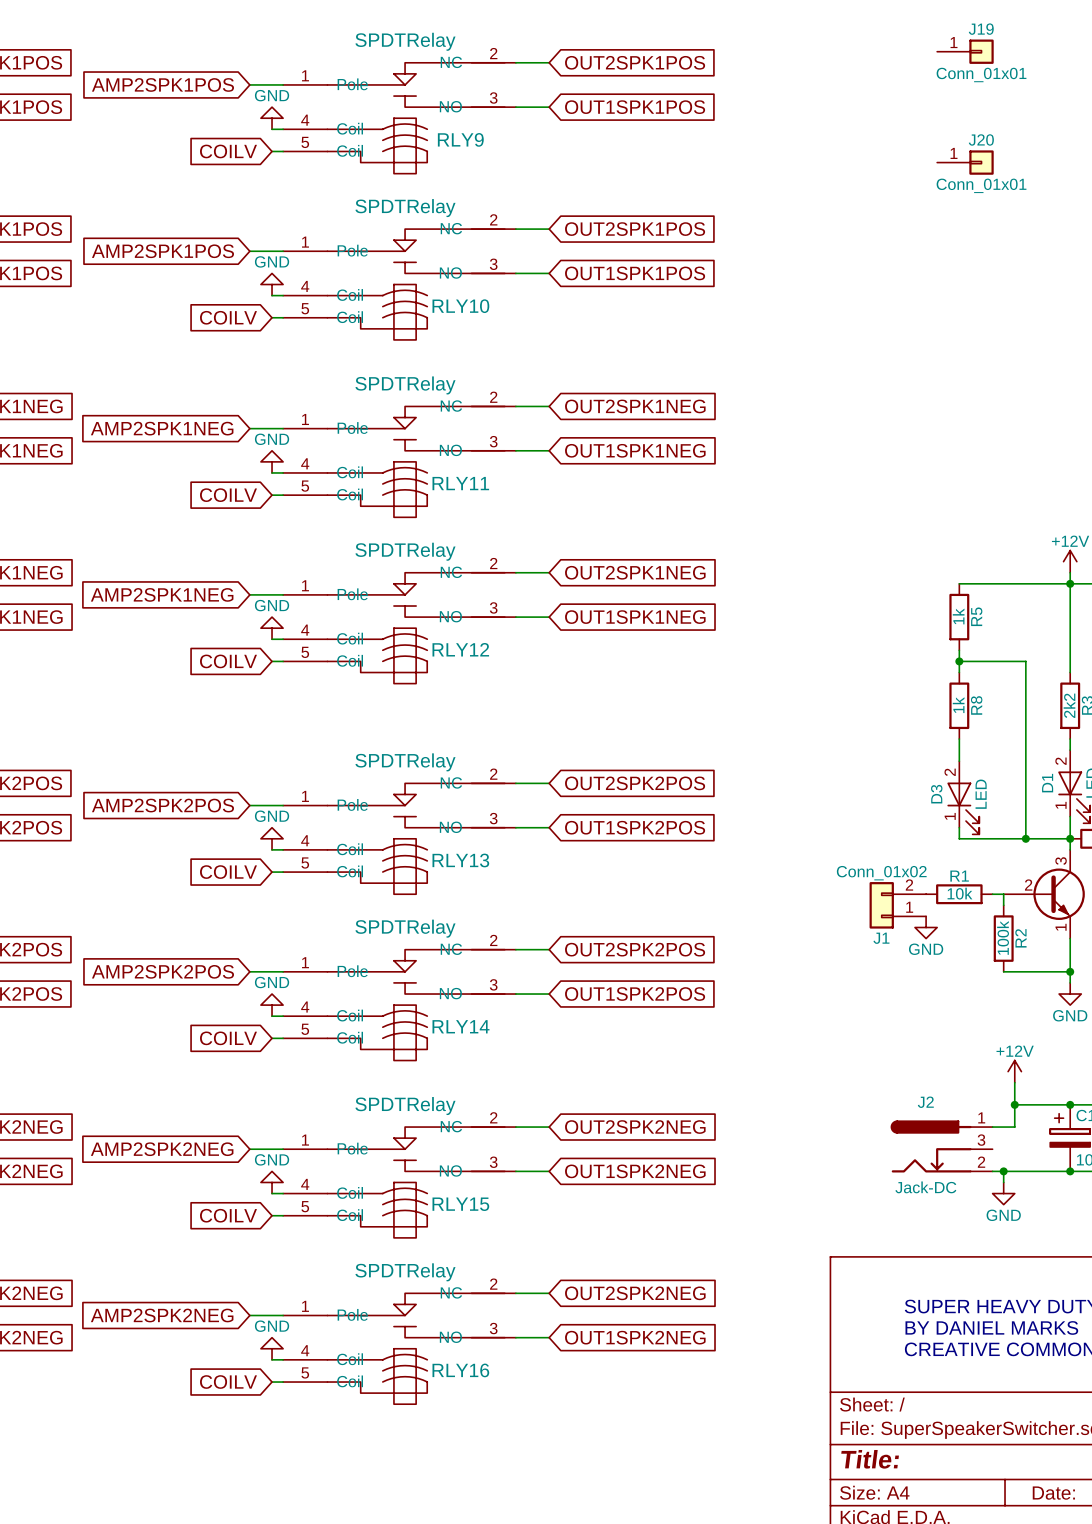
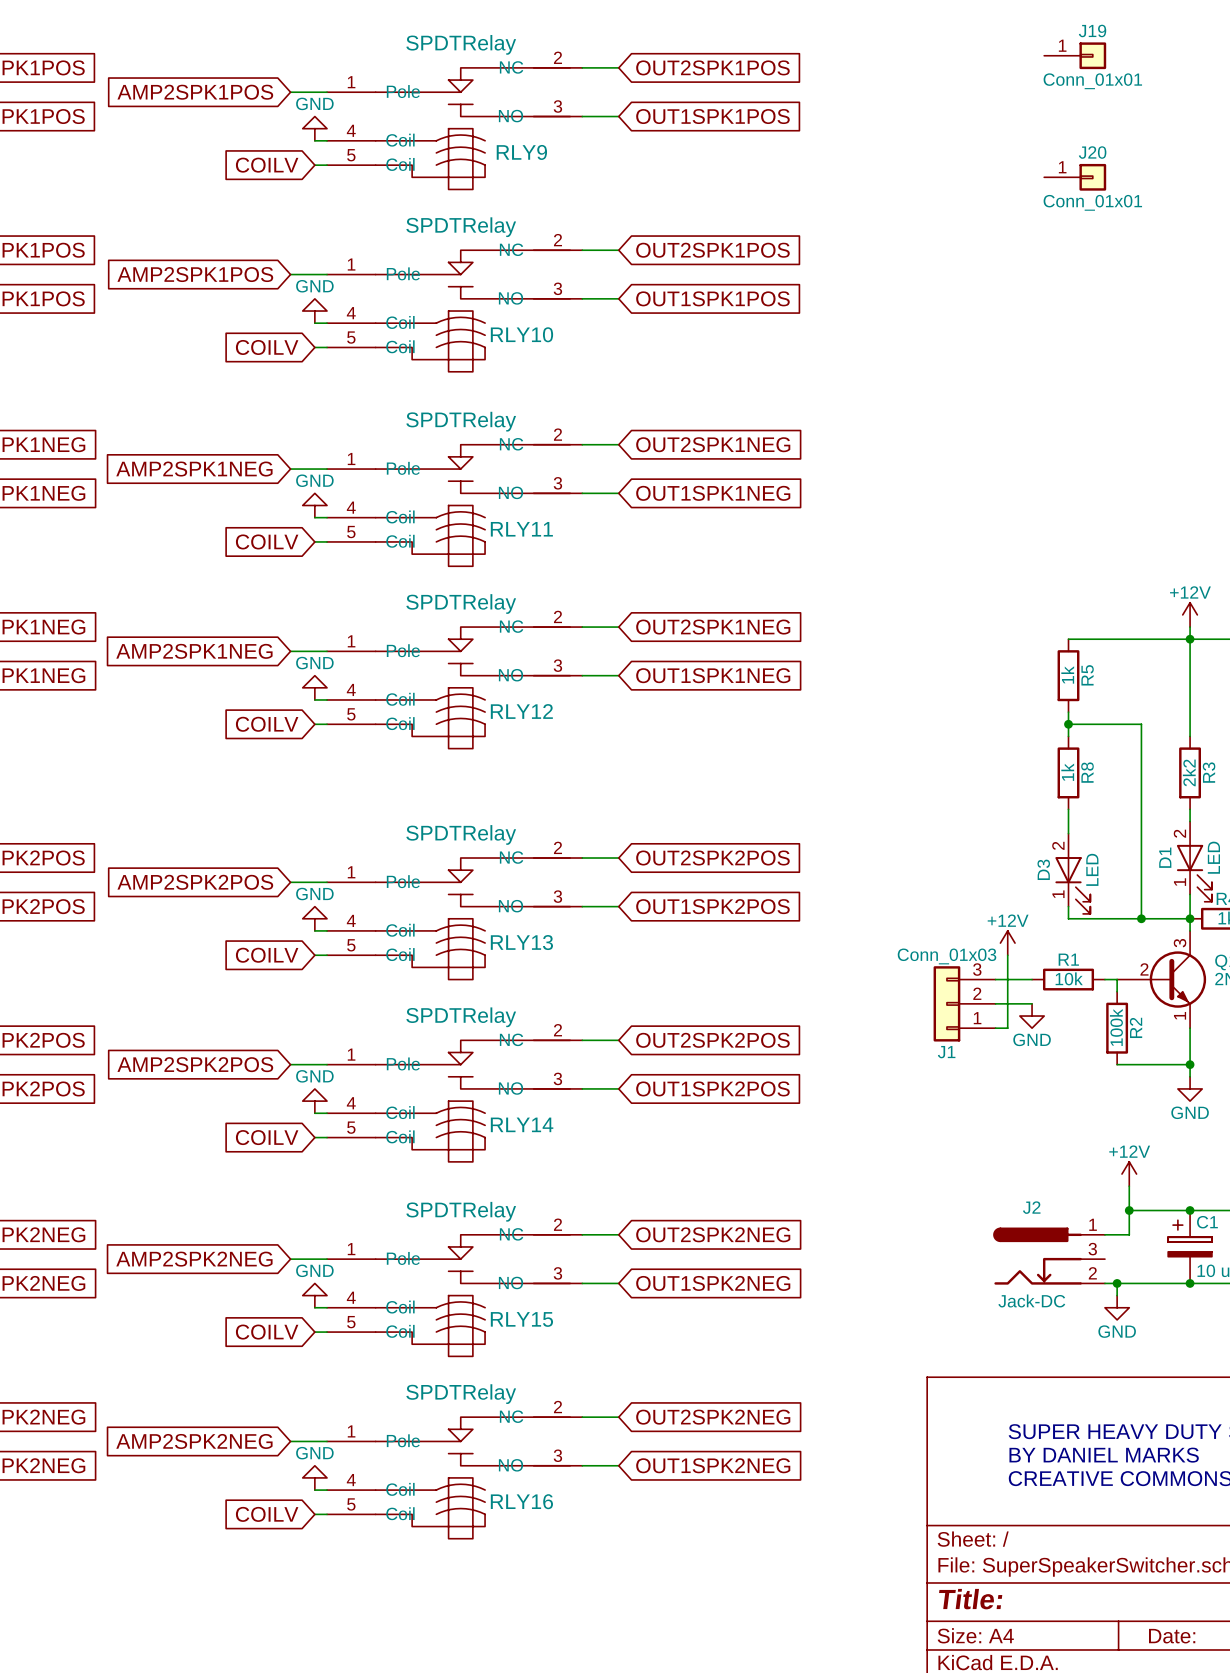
power symbol: none -> +12V (1007, 943)
wire: none -> (1007, 955) (1007, 1028) (995, 1028)
J1 value: Conn_01x02 (881, 873) -> Conn_01x03 (947, 956)
J1 symbol: [869, 882, 927, 929] -> [933, 966, 996, 1042]

